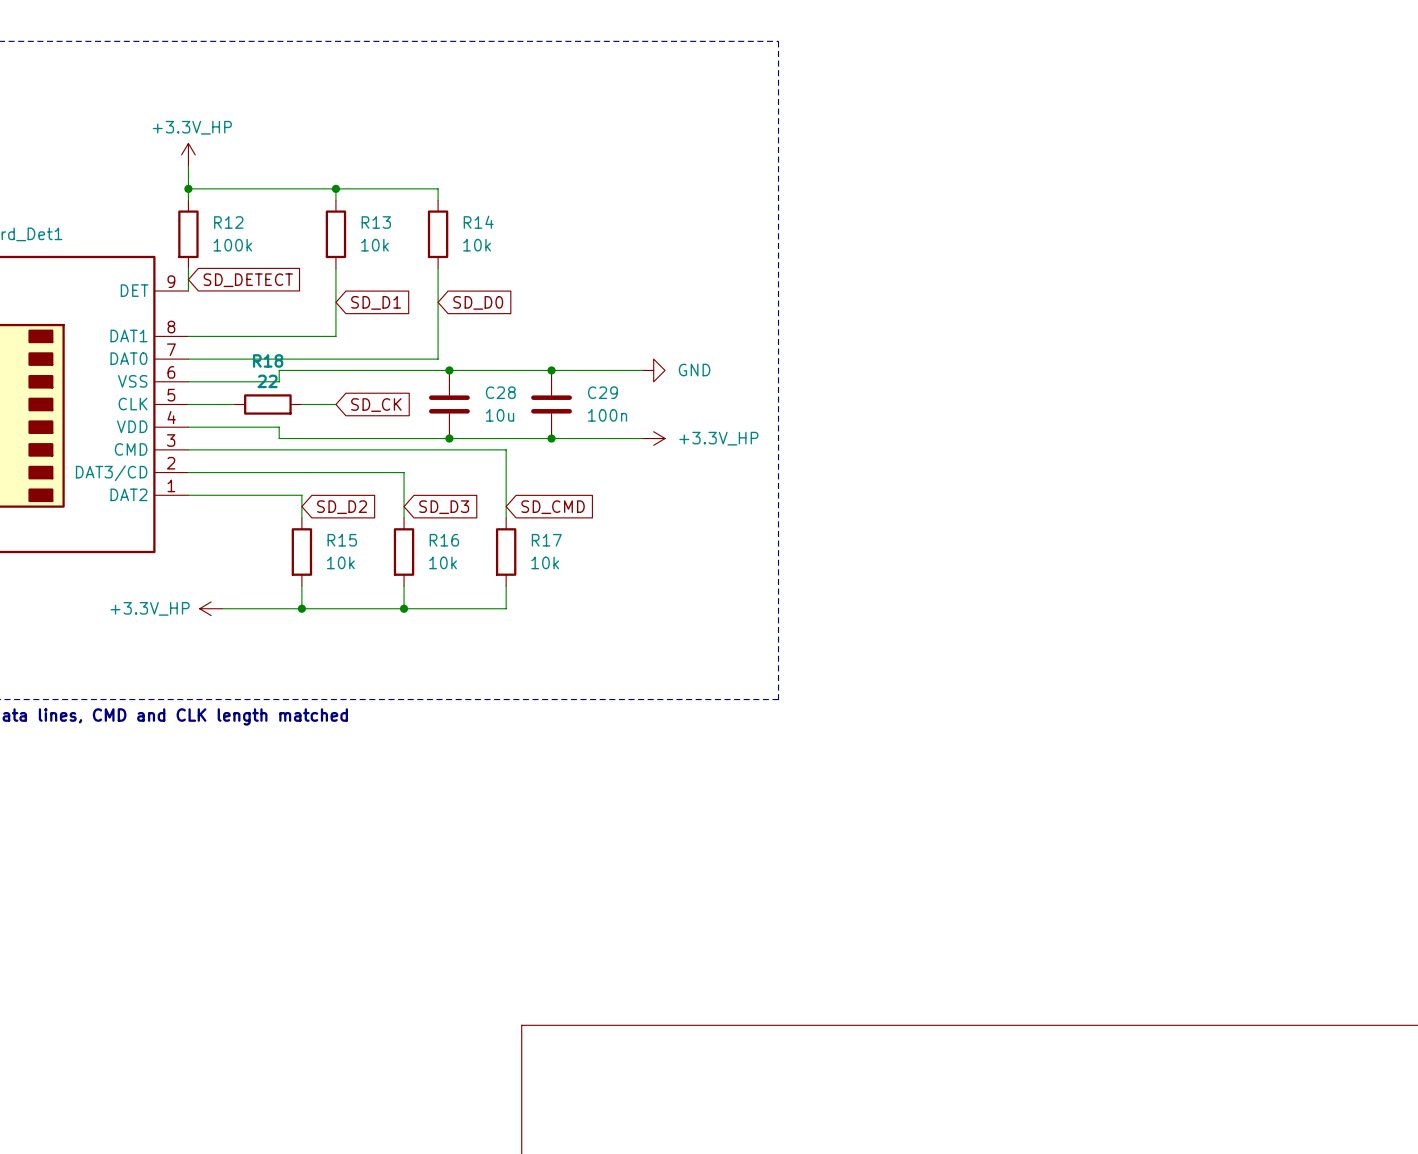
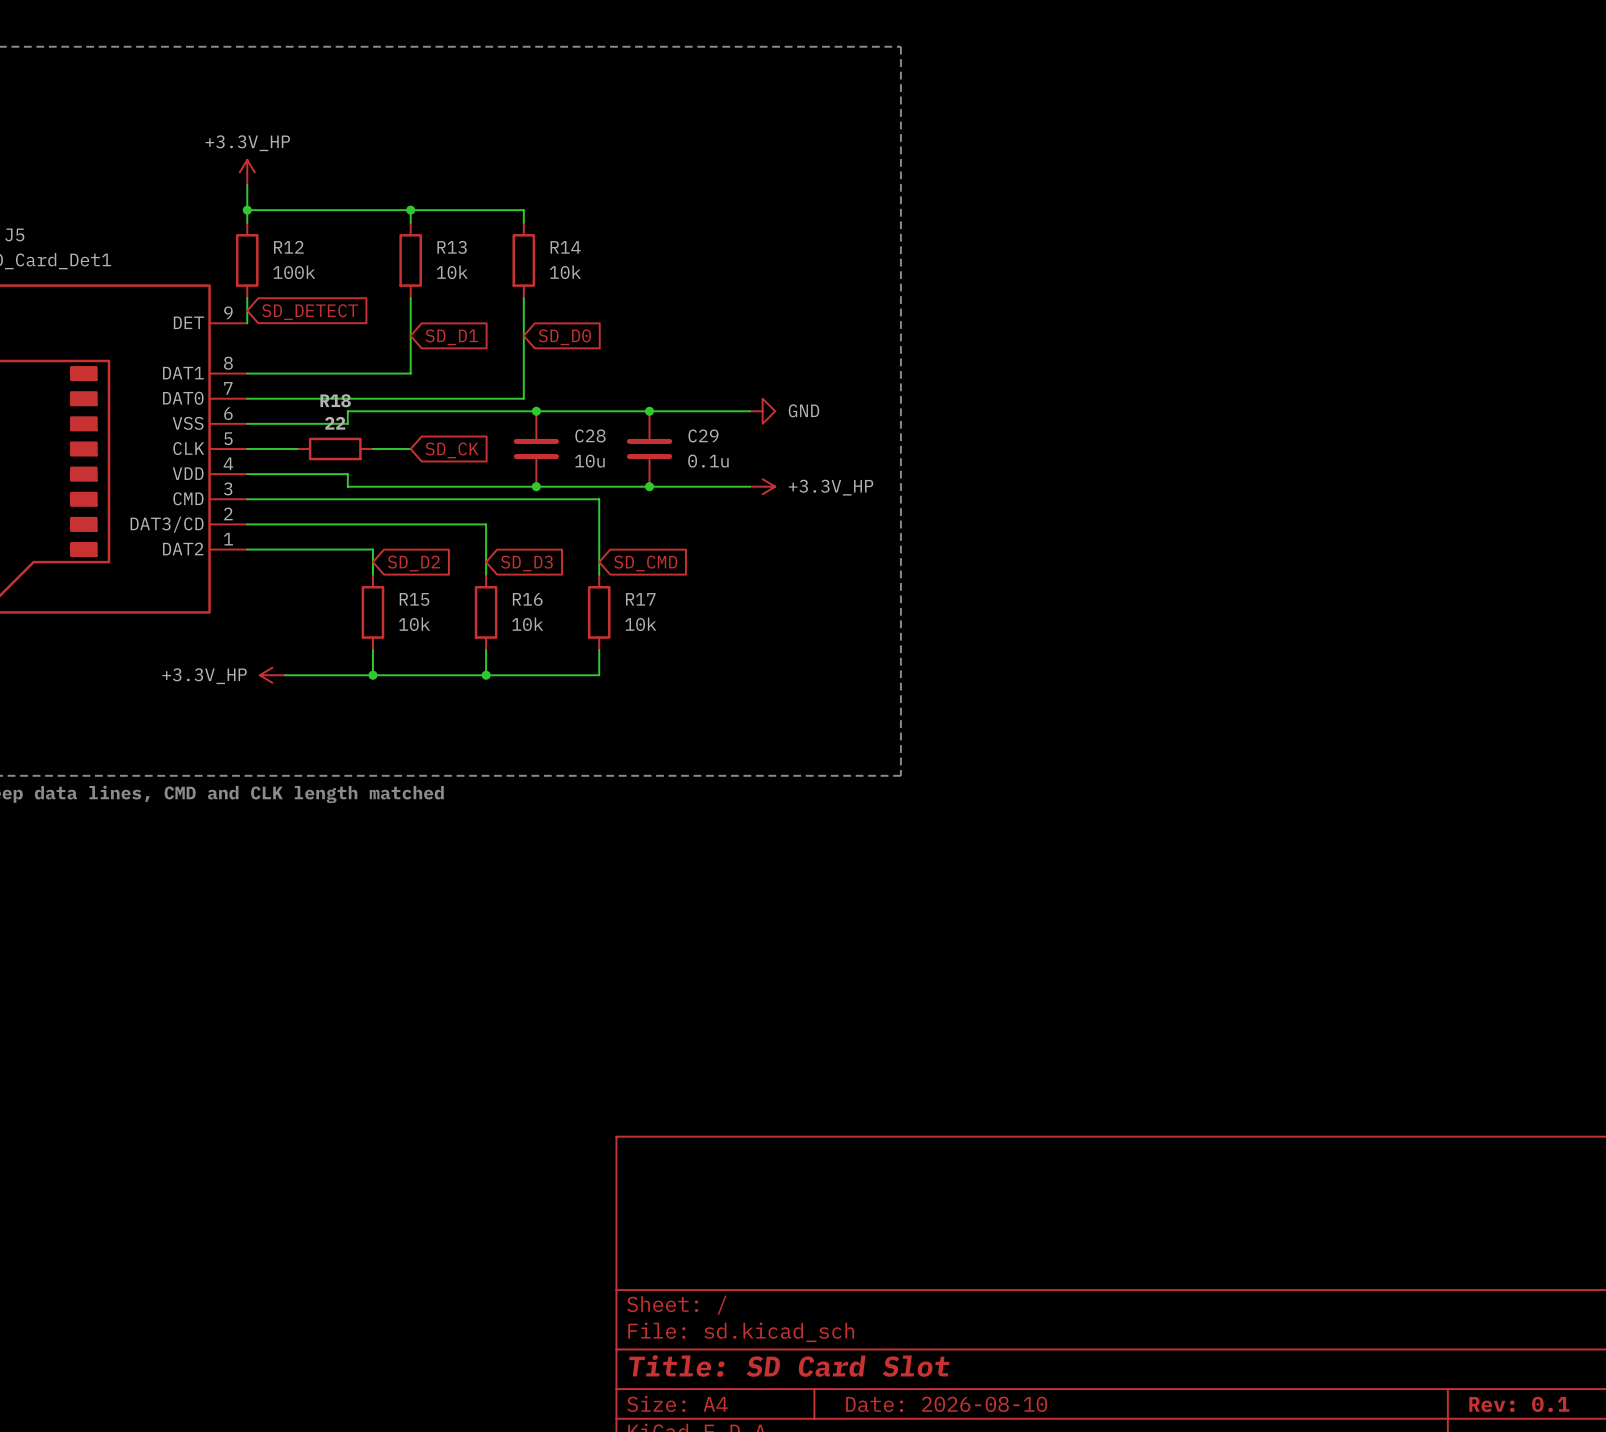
C29 value: 100n (607, 415) -> 0.1u (708, 461)

